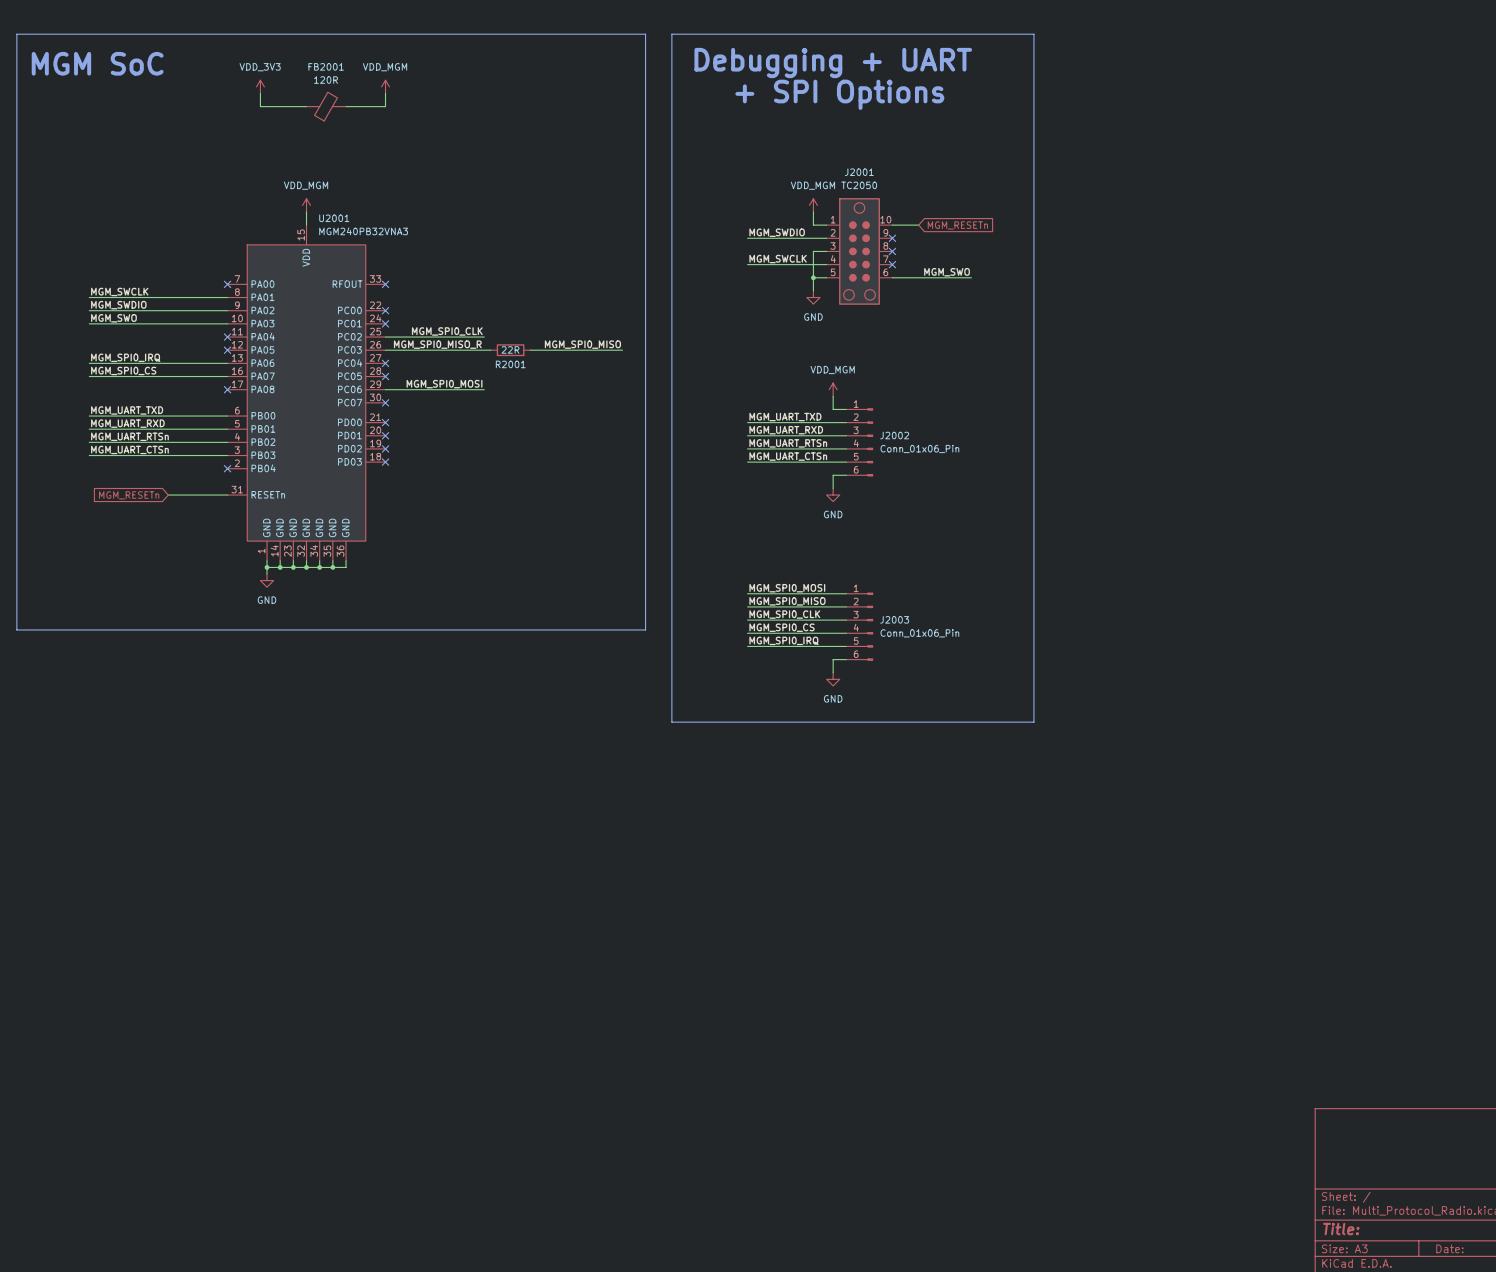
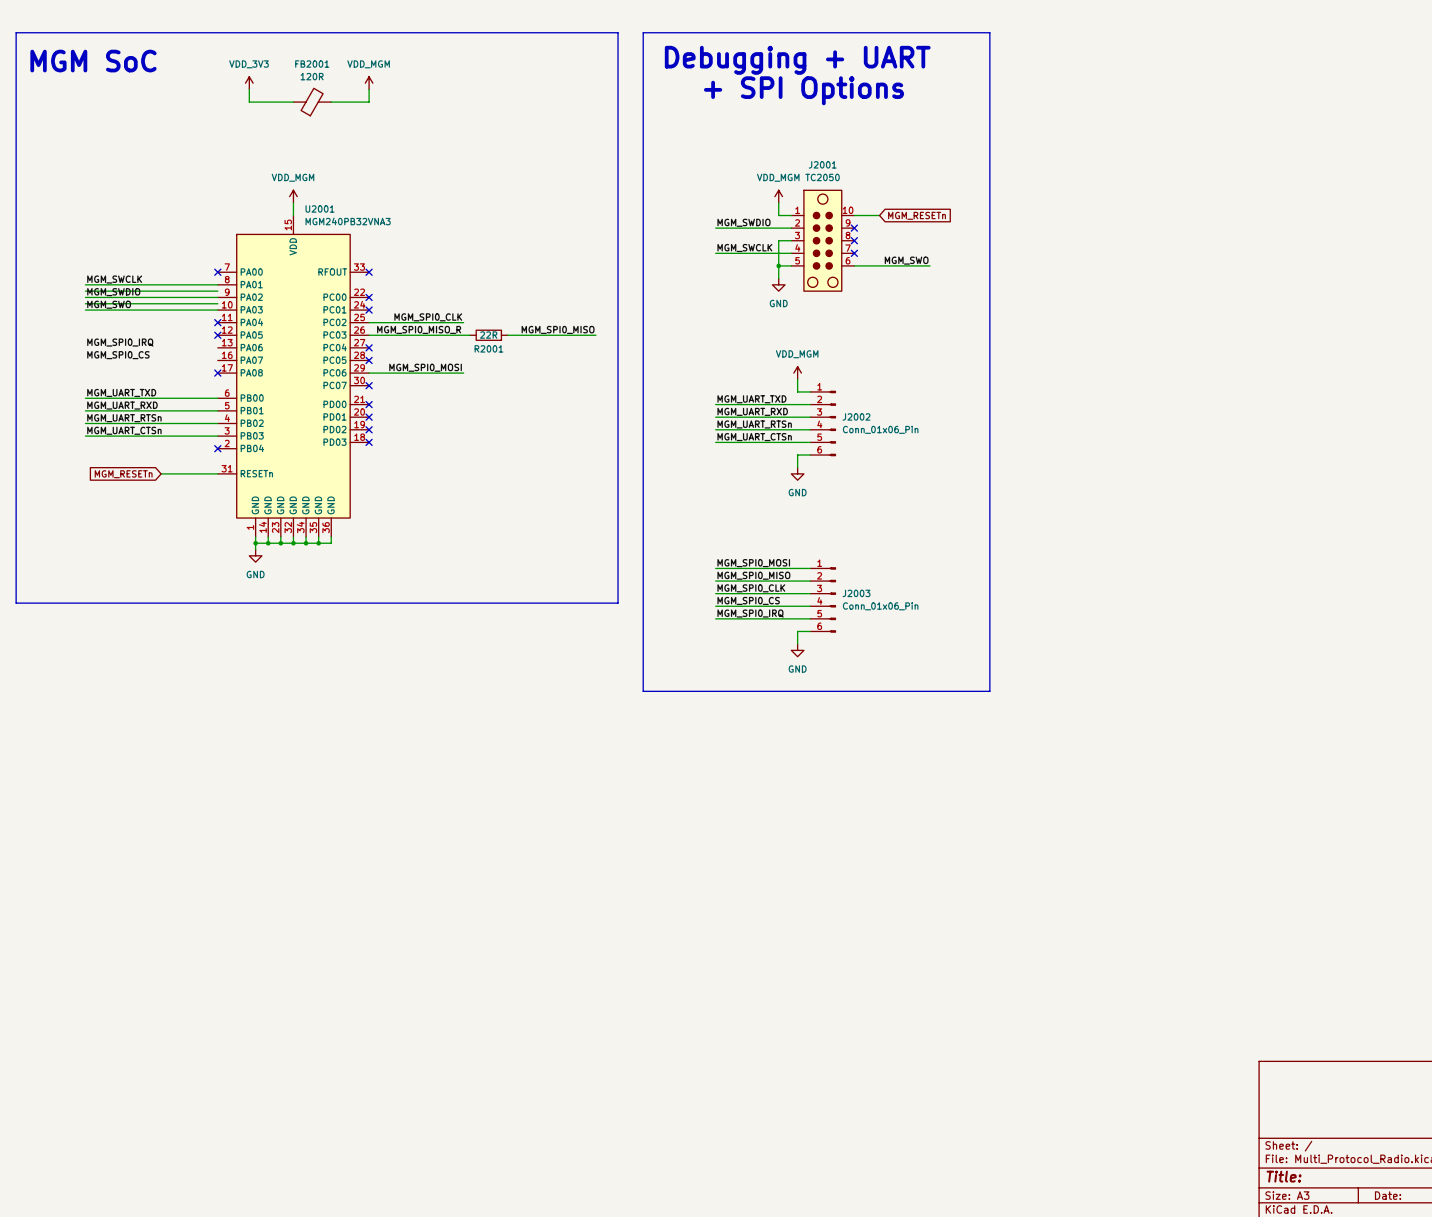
wire: (89, 363) (227, 363) -> (85, 291) (217, 291)
wire: (89, 376) (227, 376) -> (85, 303) (217, 303)

